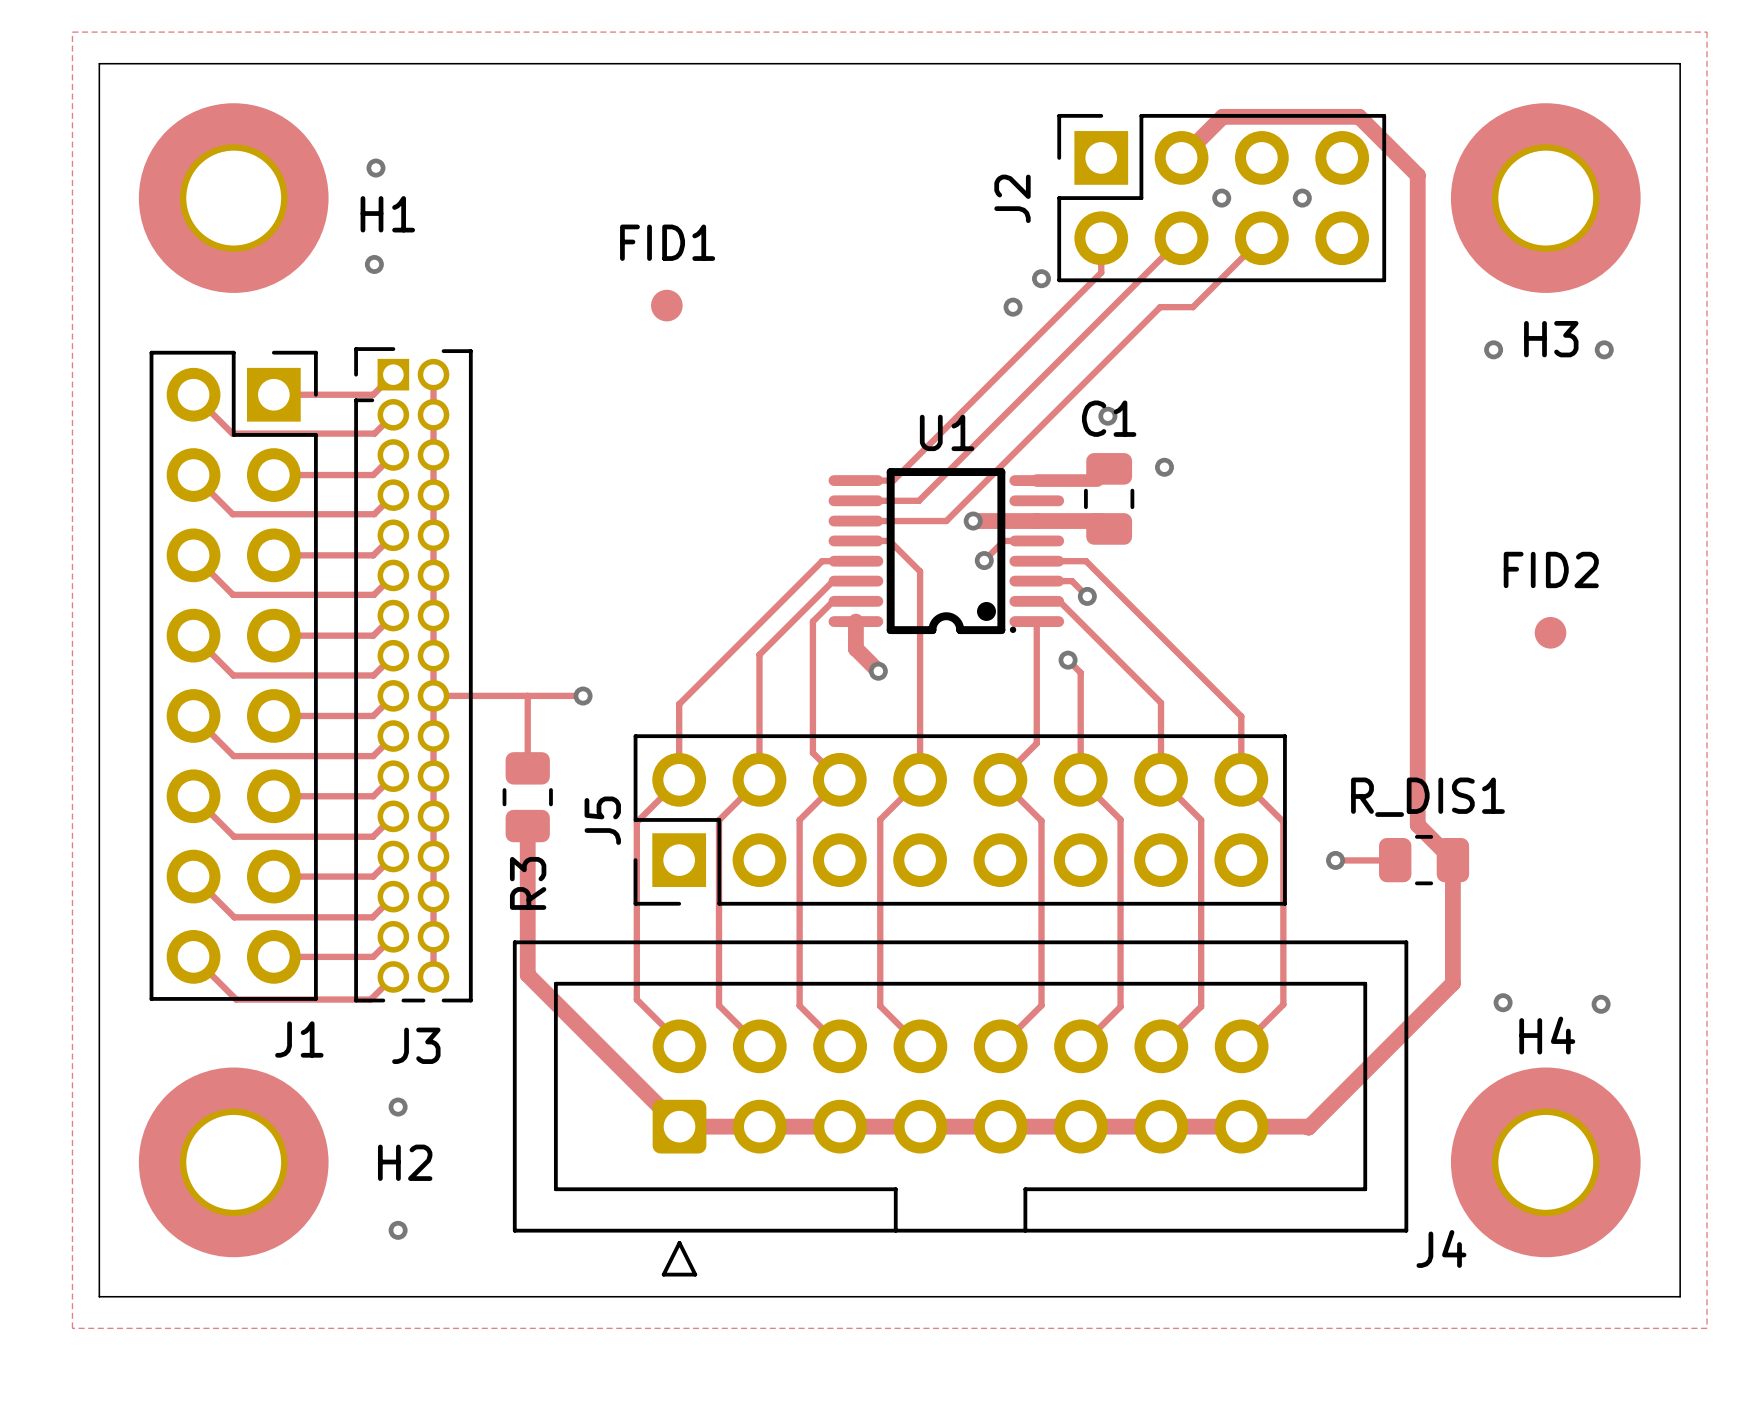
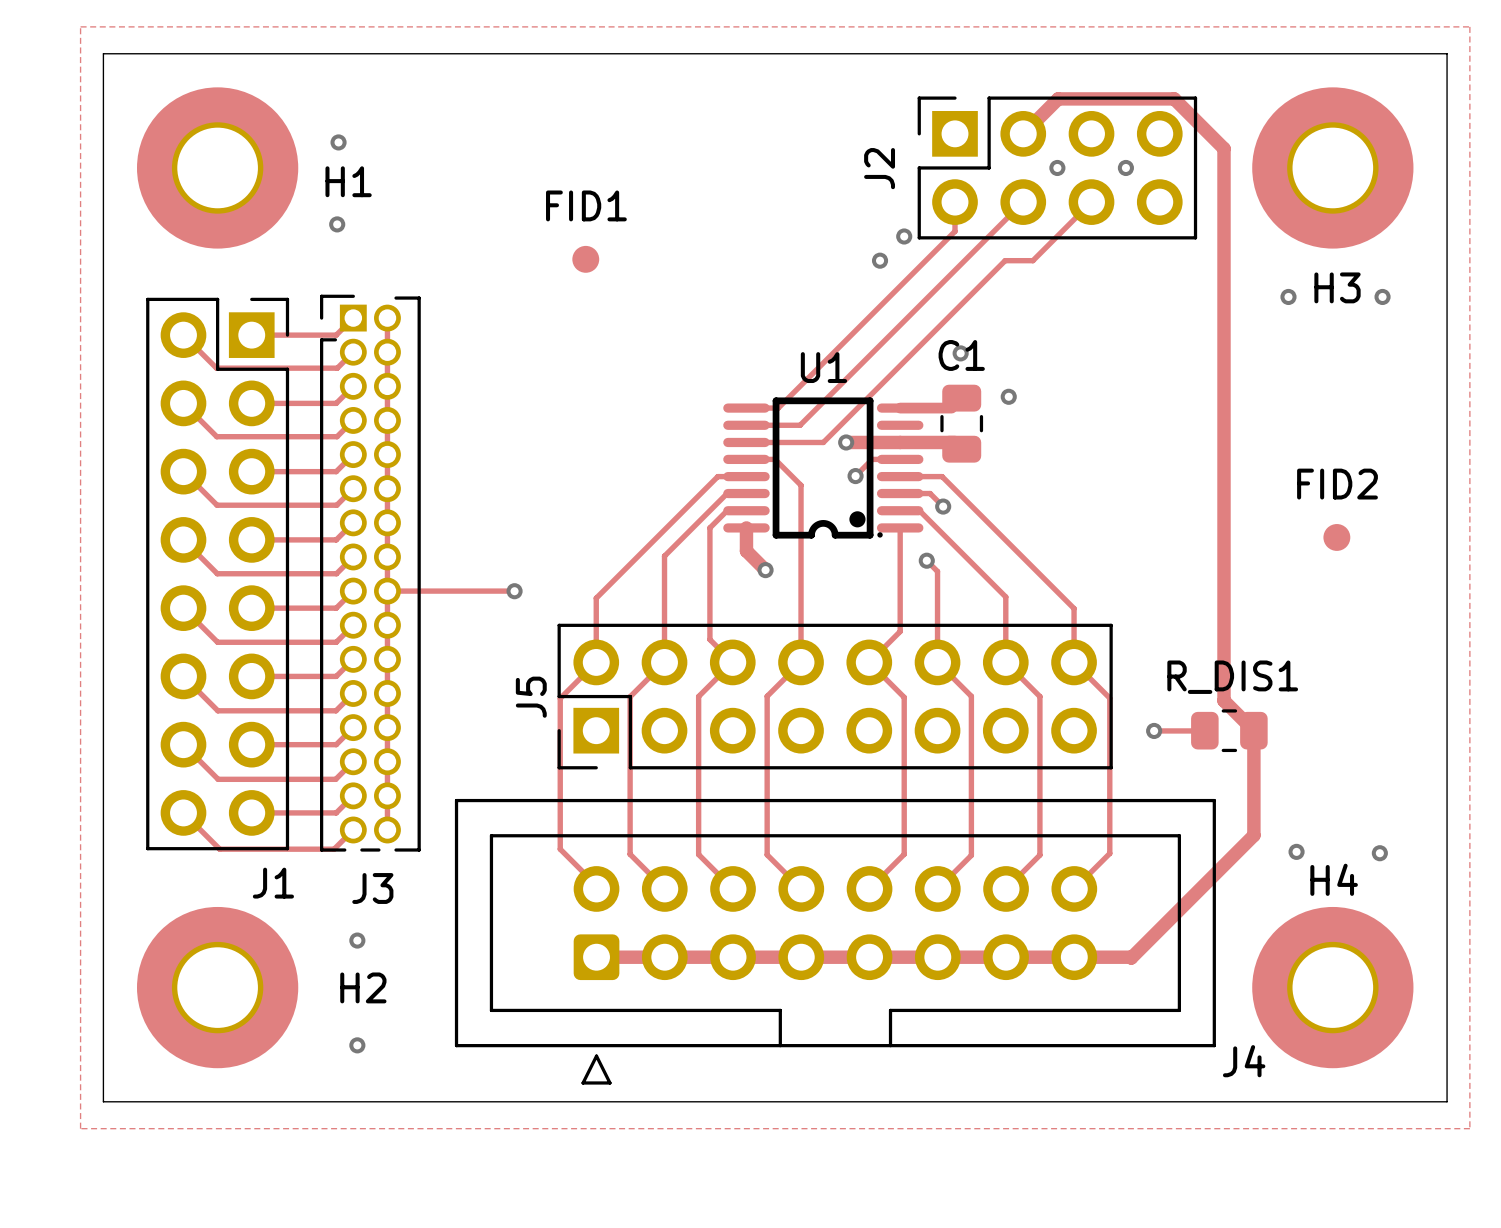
track: (527, 695) (527, 768) -> none
R3: (527, 797) -> none
track: (527, 826) (527, 974) (679, 1126) -> none

